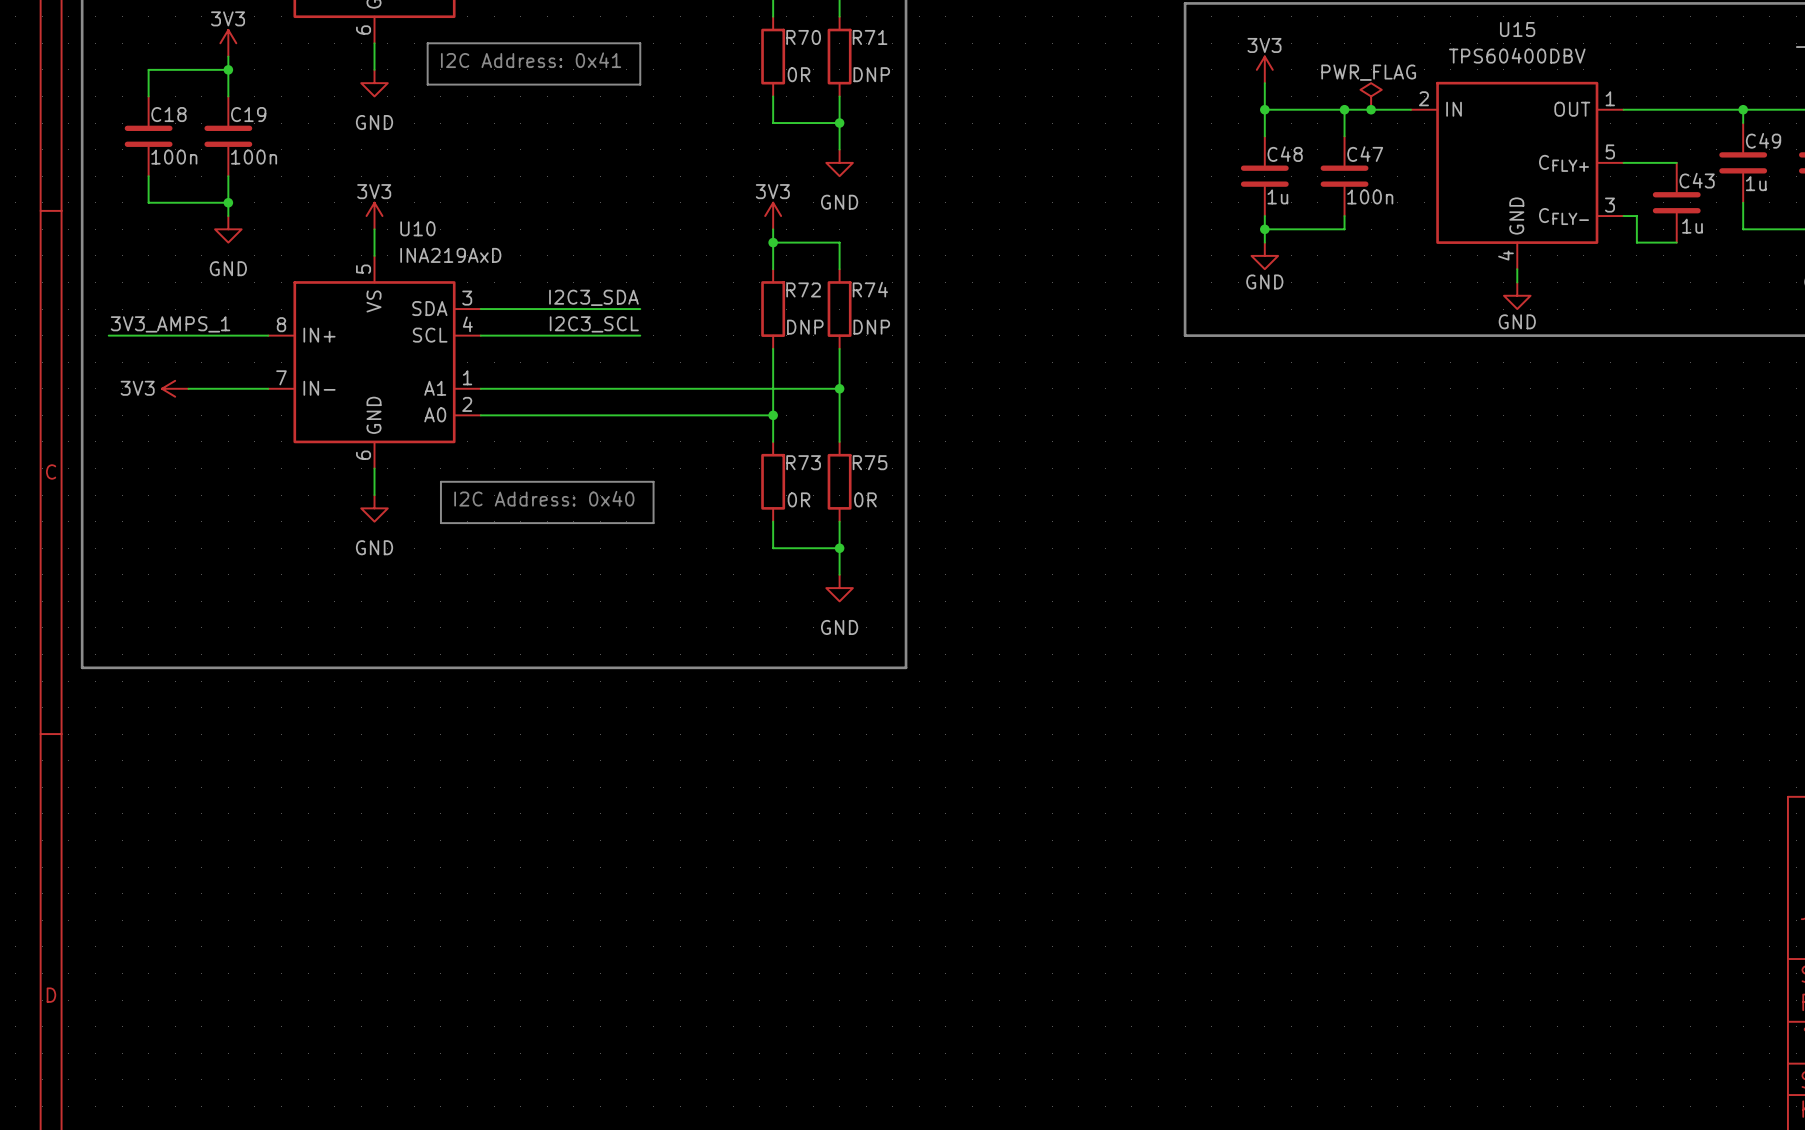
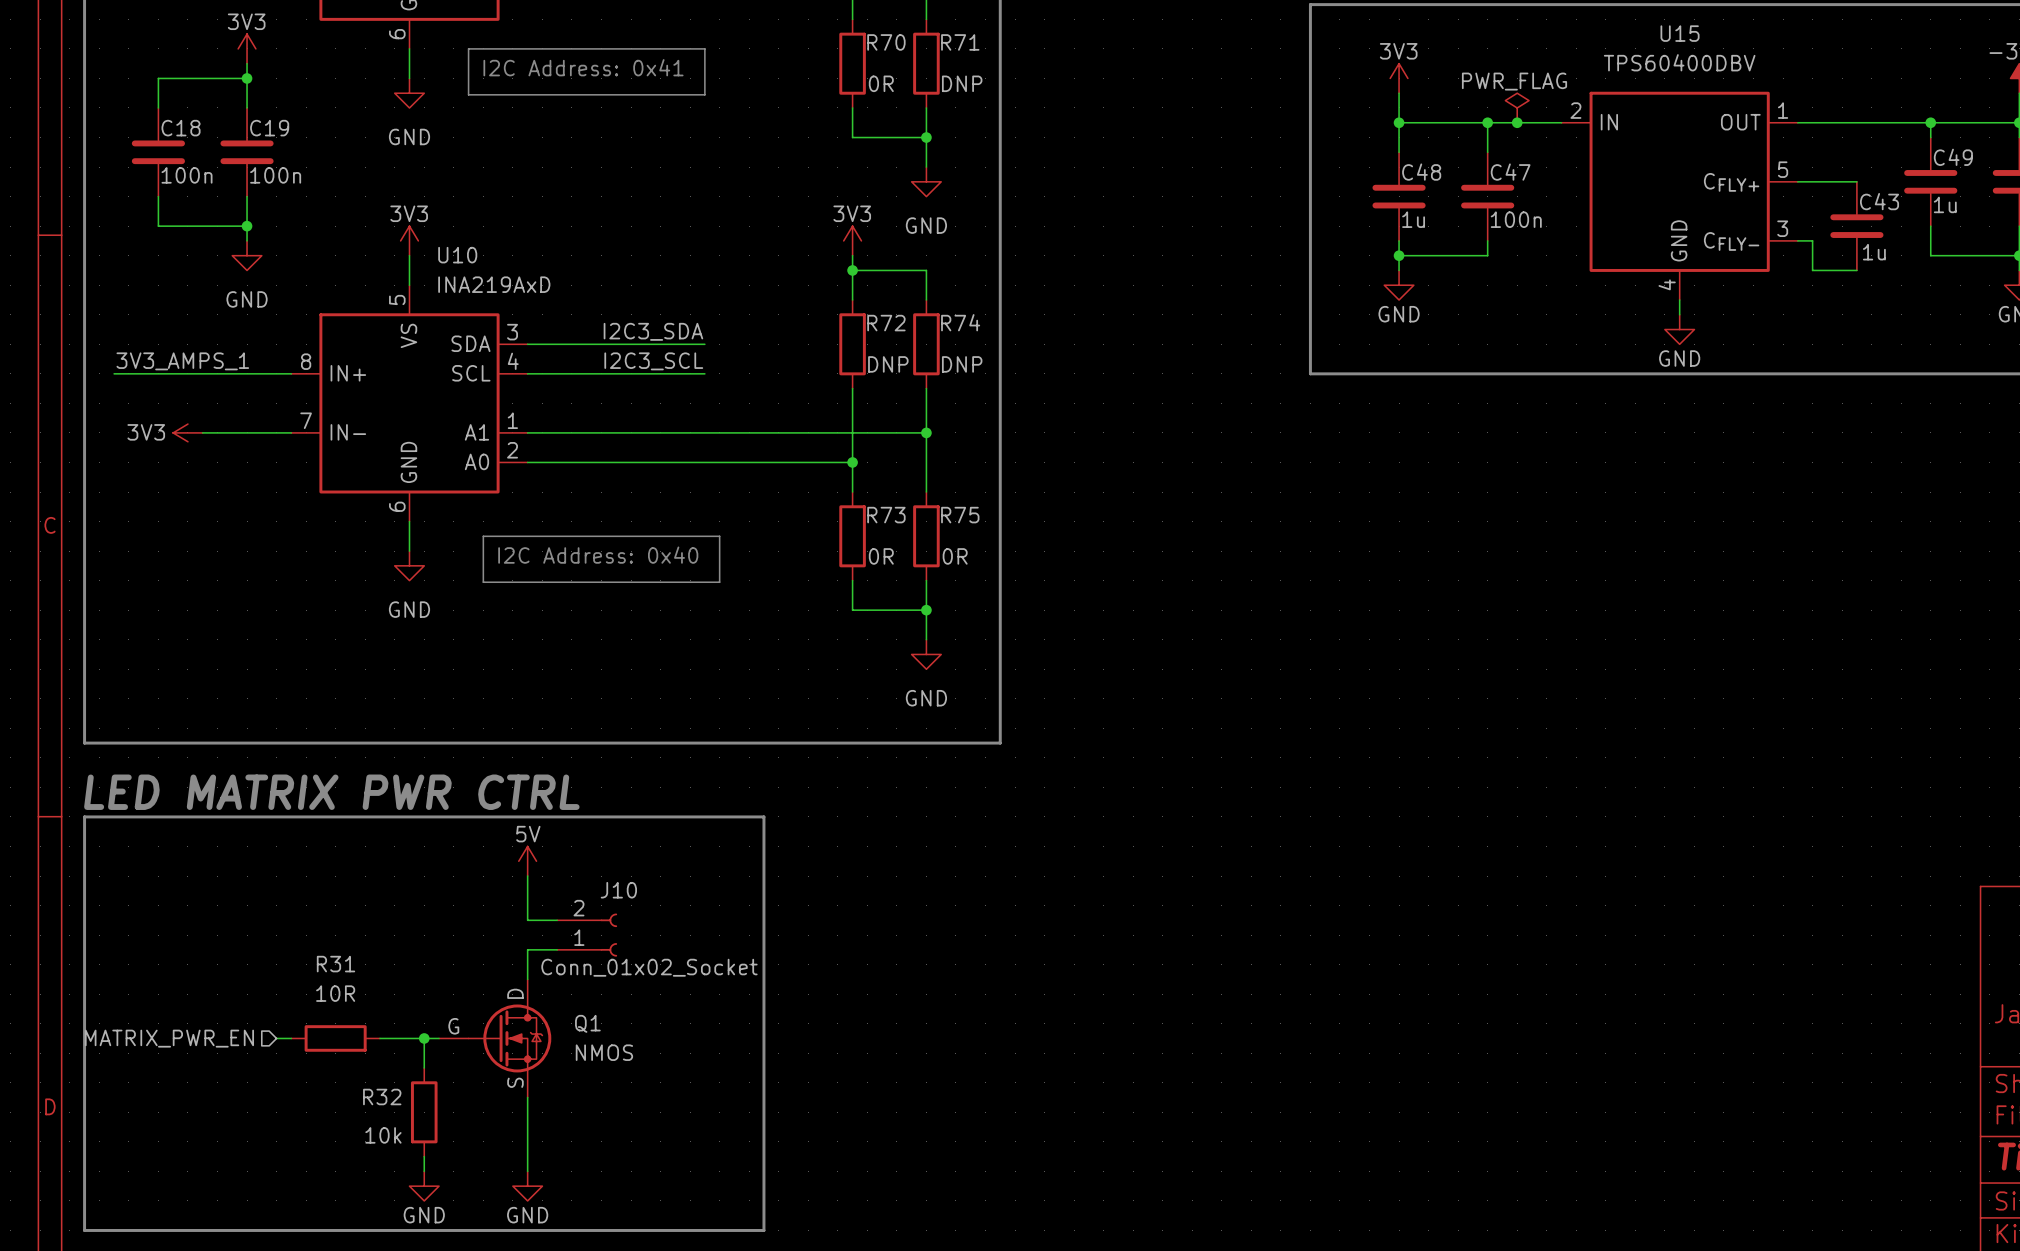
text: none -> LED MATRIX PWR CTRL (331, 792)
line: none -> (84, 816) (763, 816) (763, 1230) (84, 1230) (84, 816)
power symbol: none -> 5V (527, 861)
wire: none -> (527, 876) (527, 920) (557, 920)
J10: none -> Conn_01x02_Socket (587, 935)
wire: none -> (557, 949) (527, 949) (527, 979)
hierarchical label: none -> MATRIX_PWR_EN (169, 1038)
wire: none -> (276, 1038) (291, 1038)
R31: none -> 10R (335, 1038)
wire: none -> (379, 1038) (439, 1038)
wire: none -> (424, 1038) (424, 1068)
junction: none -> (424, 1038)
Q1: none -> NMOS (495, 1038)
wire: none -> (527, 1097) (527, 1171)
R32: none -> 10k (424, 1112)
wire: none -> (424, 1156) (424, 1171)
power symbol: none -> GND (424, 1186)
power symbol: none -> GND (527, 1186)

